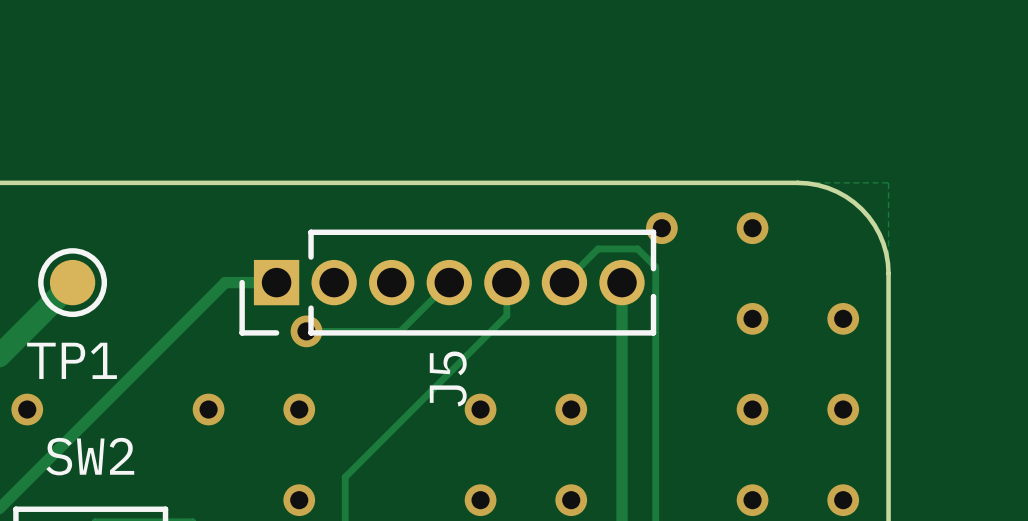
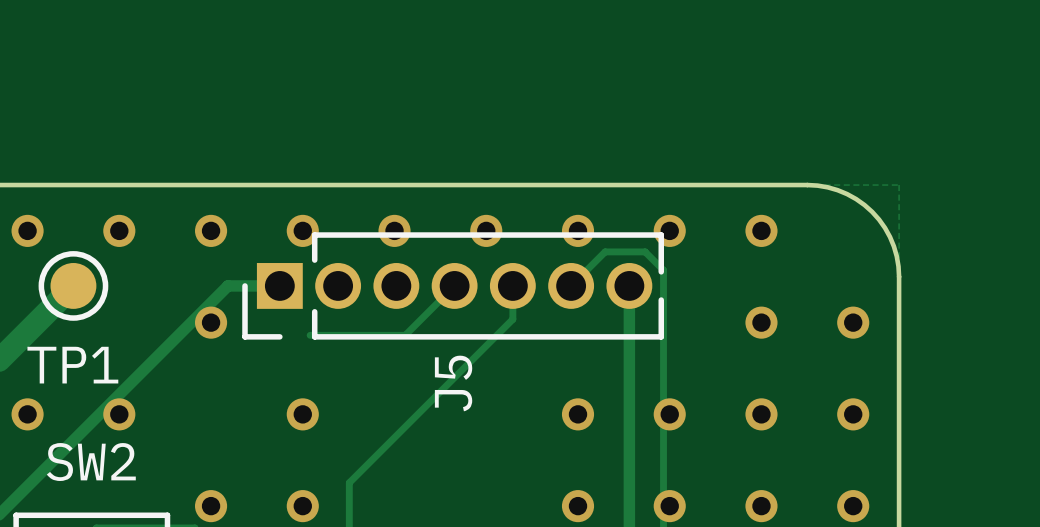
via: none -> (27, 230)
via: none -> (119, 230)
via: none -> (211, 230)
via: none -> (302, 230)
via: none -> (394, 230)
via: none -> (486, 230)
via: none -> (578, 230)
via: none -> (211, 322)
via: (306, 331) -> none
via: none -> (119, 414)
via: (208, 409) -> none
via: (480, 409) -> none
via: none -> (669, 414)
via: none -> (211, 506)
via: (480, 500) -> none
via: none -> (669, 506)

